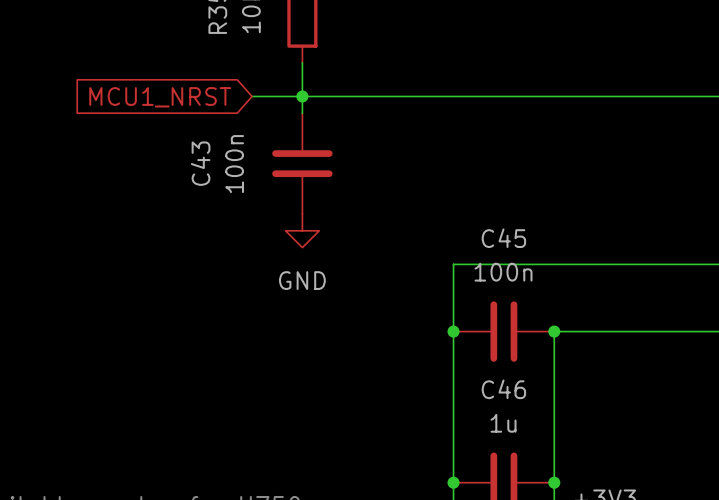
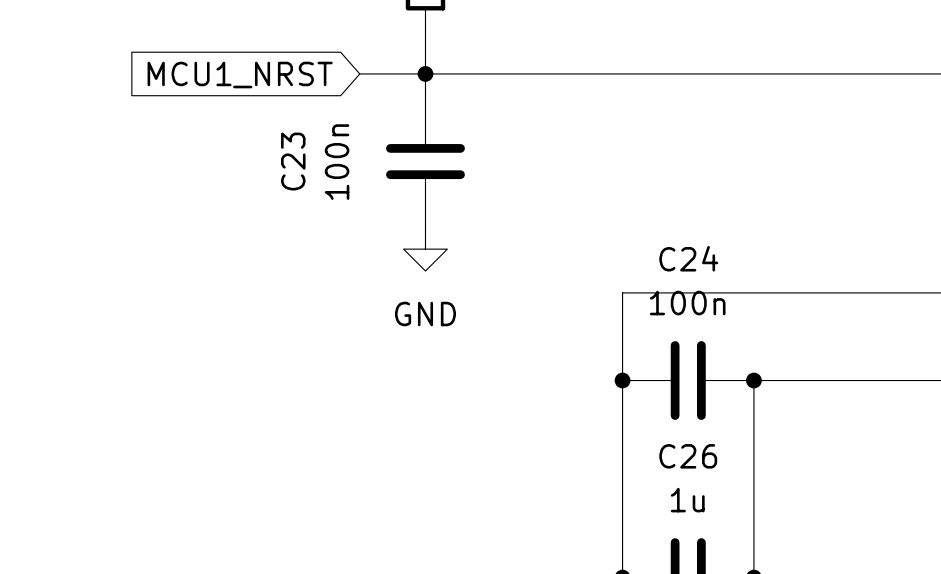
C43 name: C43 (200, 163) -> C23 (293, 161)
C45 name: C45 (503, 238) -> C24 (688, 258)
C46 name: C46 (503, 389) -> C26 (688, 456)

